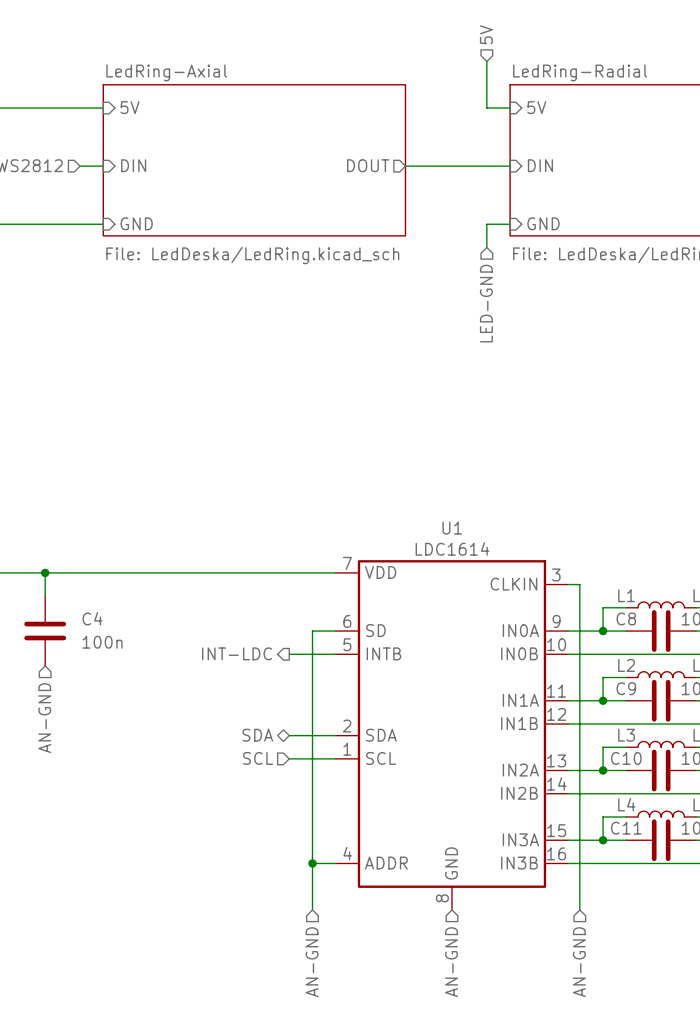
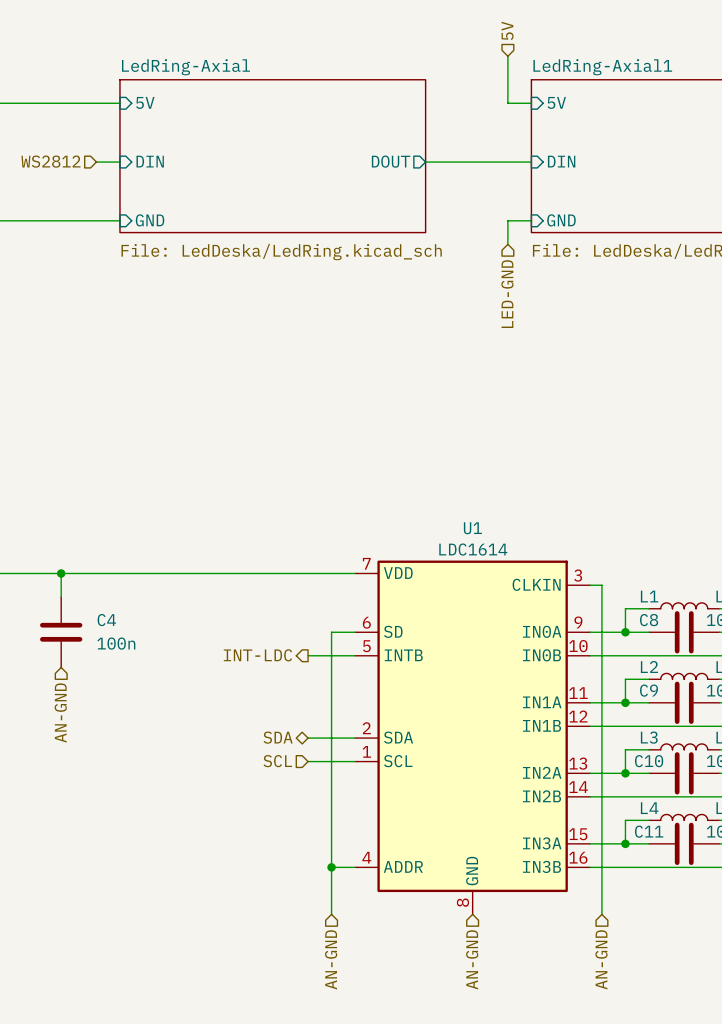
sheet LedRing-Radial name: LedRing-Radial (580, 72) -> LedRing-Axial1 (602, 67)

